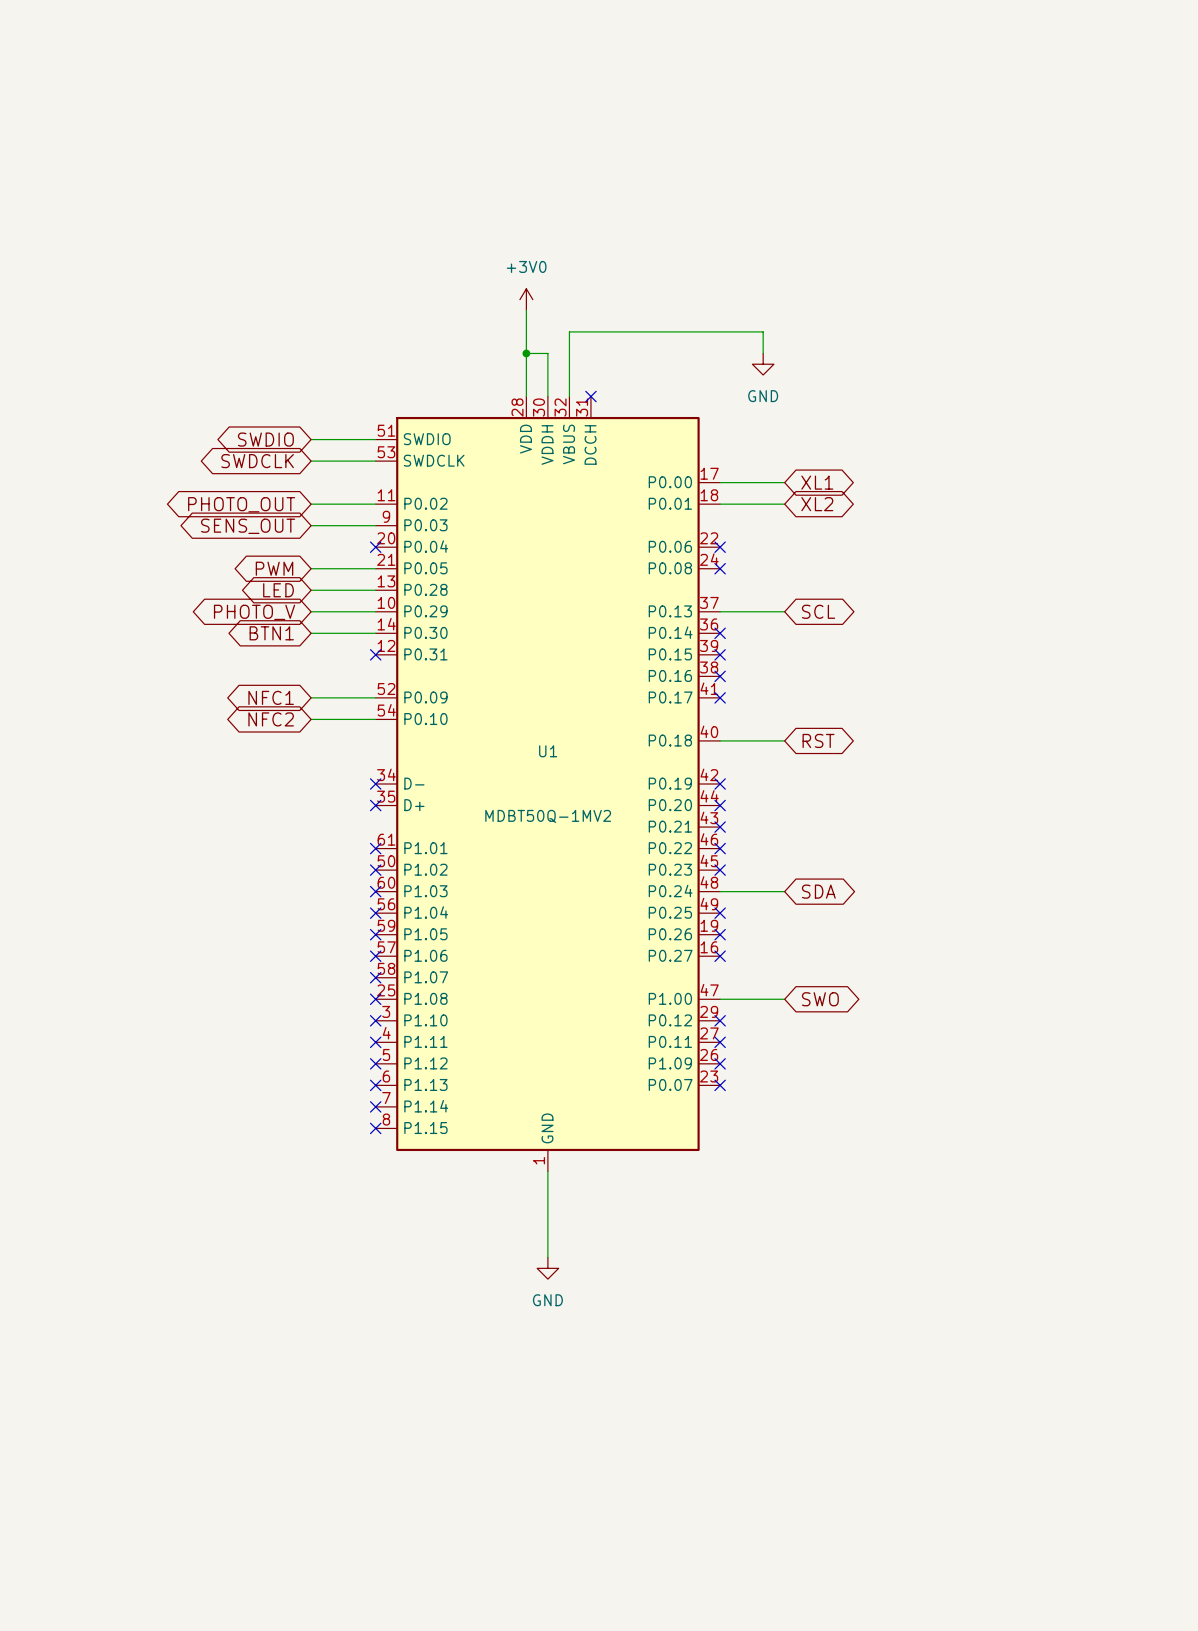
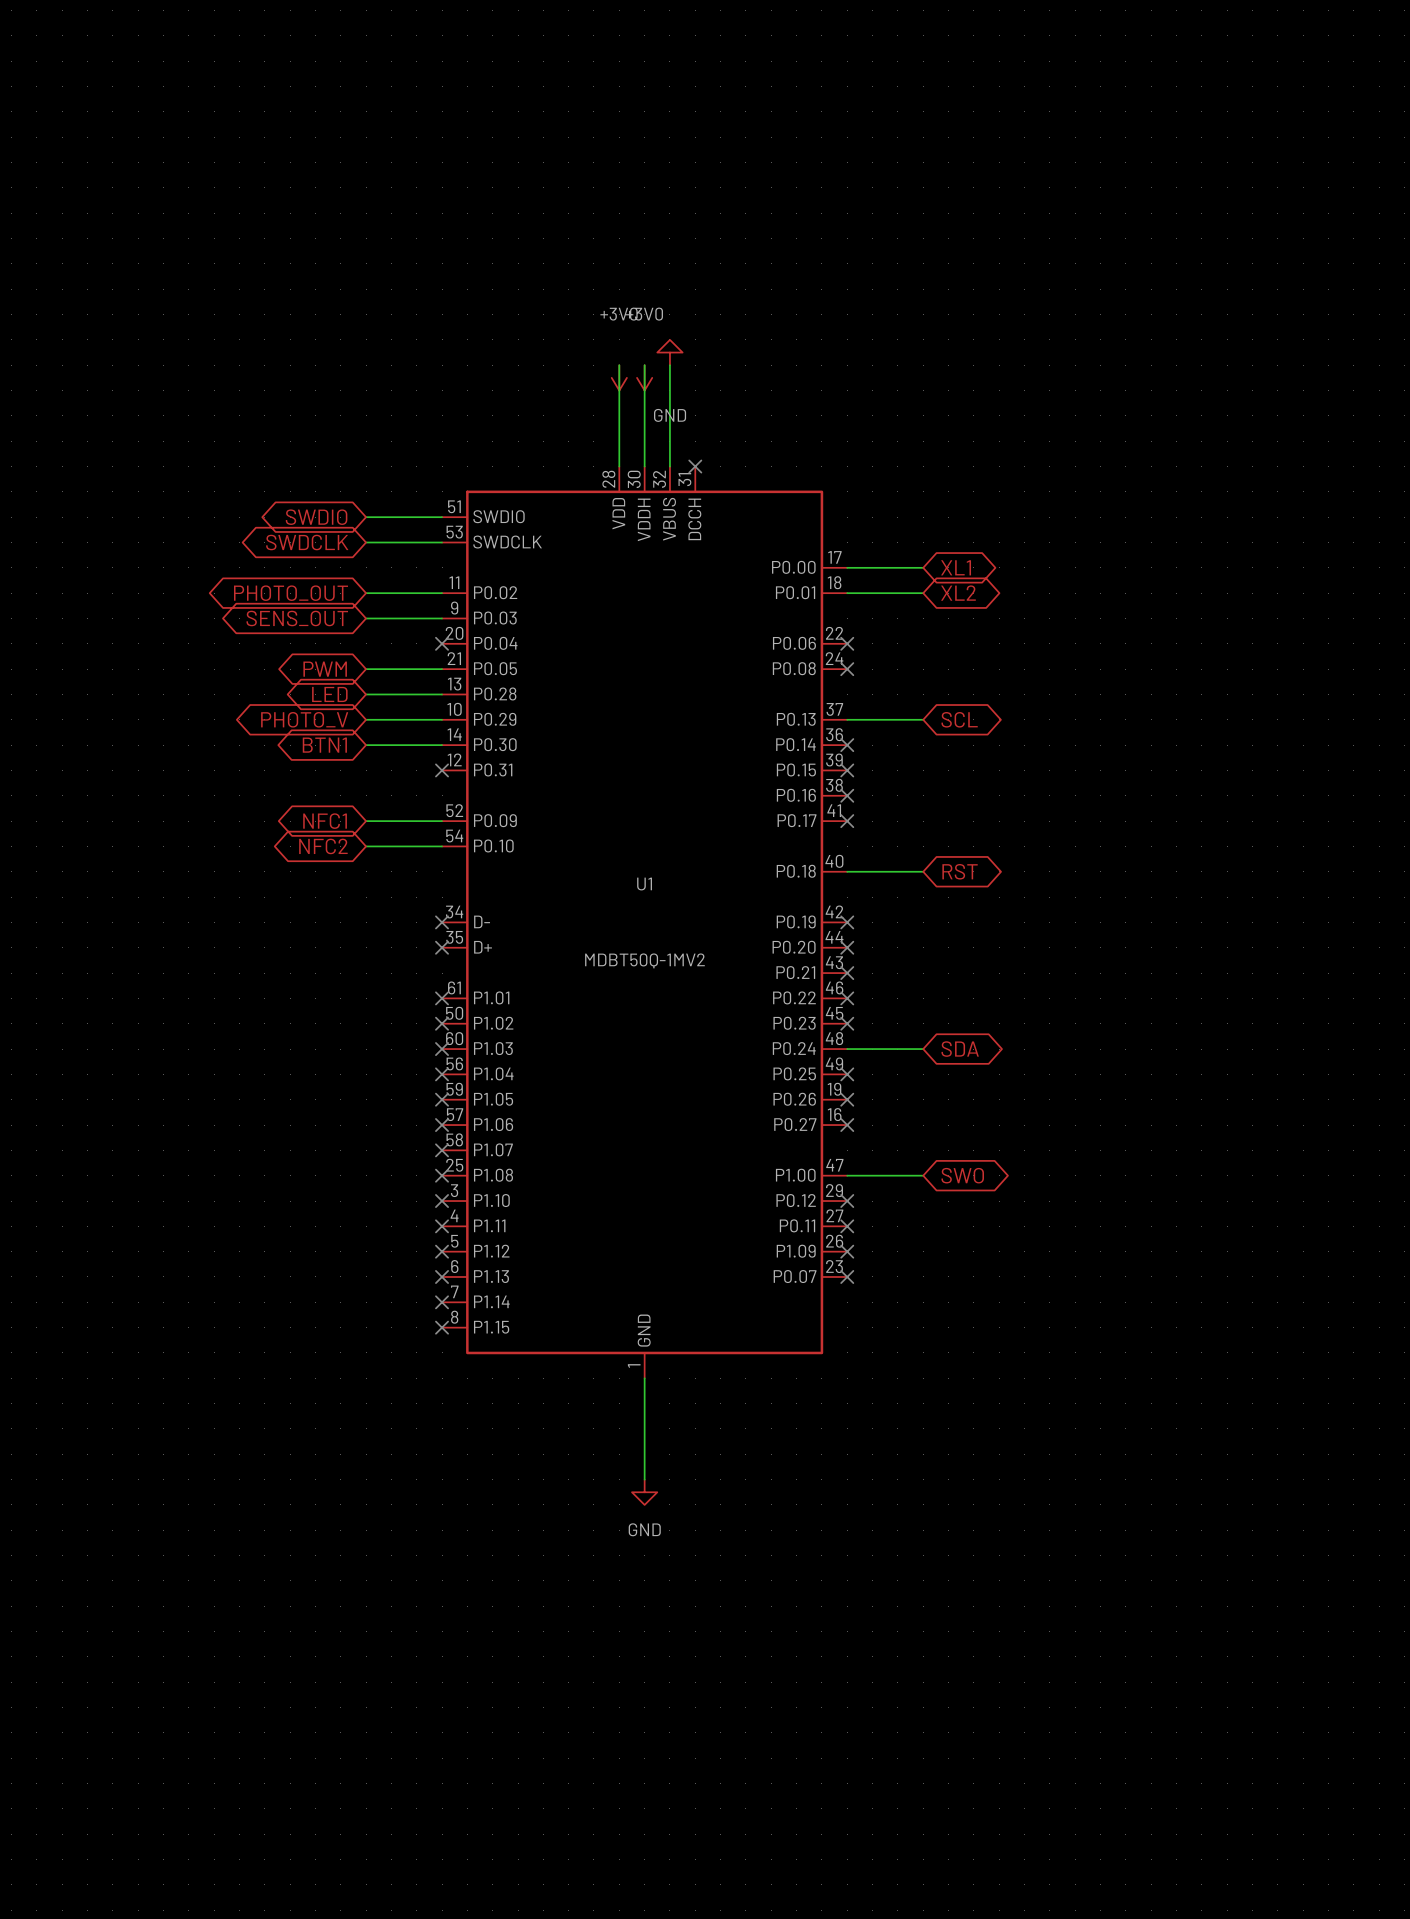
power symbol: +3V0 (526, 299) -> none
power symbol: none -> +3V0 (619, 377)
power symbol: none -> +3V0 (644, 377)
wire: (569, 331) (763, 331) (763, 353) -> (669, 390) (669, 365)
wire: (526, 353) (547, 353) -> (644, 365) (644, 415)
junction: (526, 353) -> none
power symbol rotation: 0° (763, 364) -> 180° (669, 352)
power symbol position: GND (763, 364) -> GND (669, 352)
power symbol text position: GND (763, 396) -> GND (670, 415)

